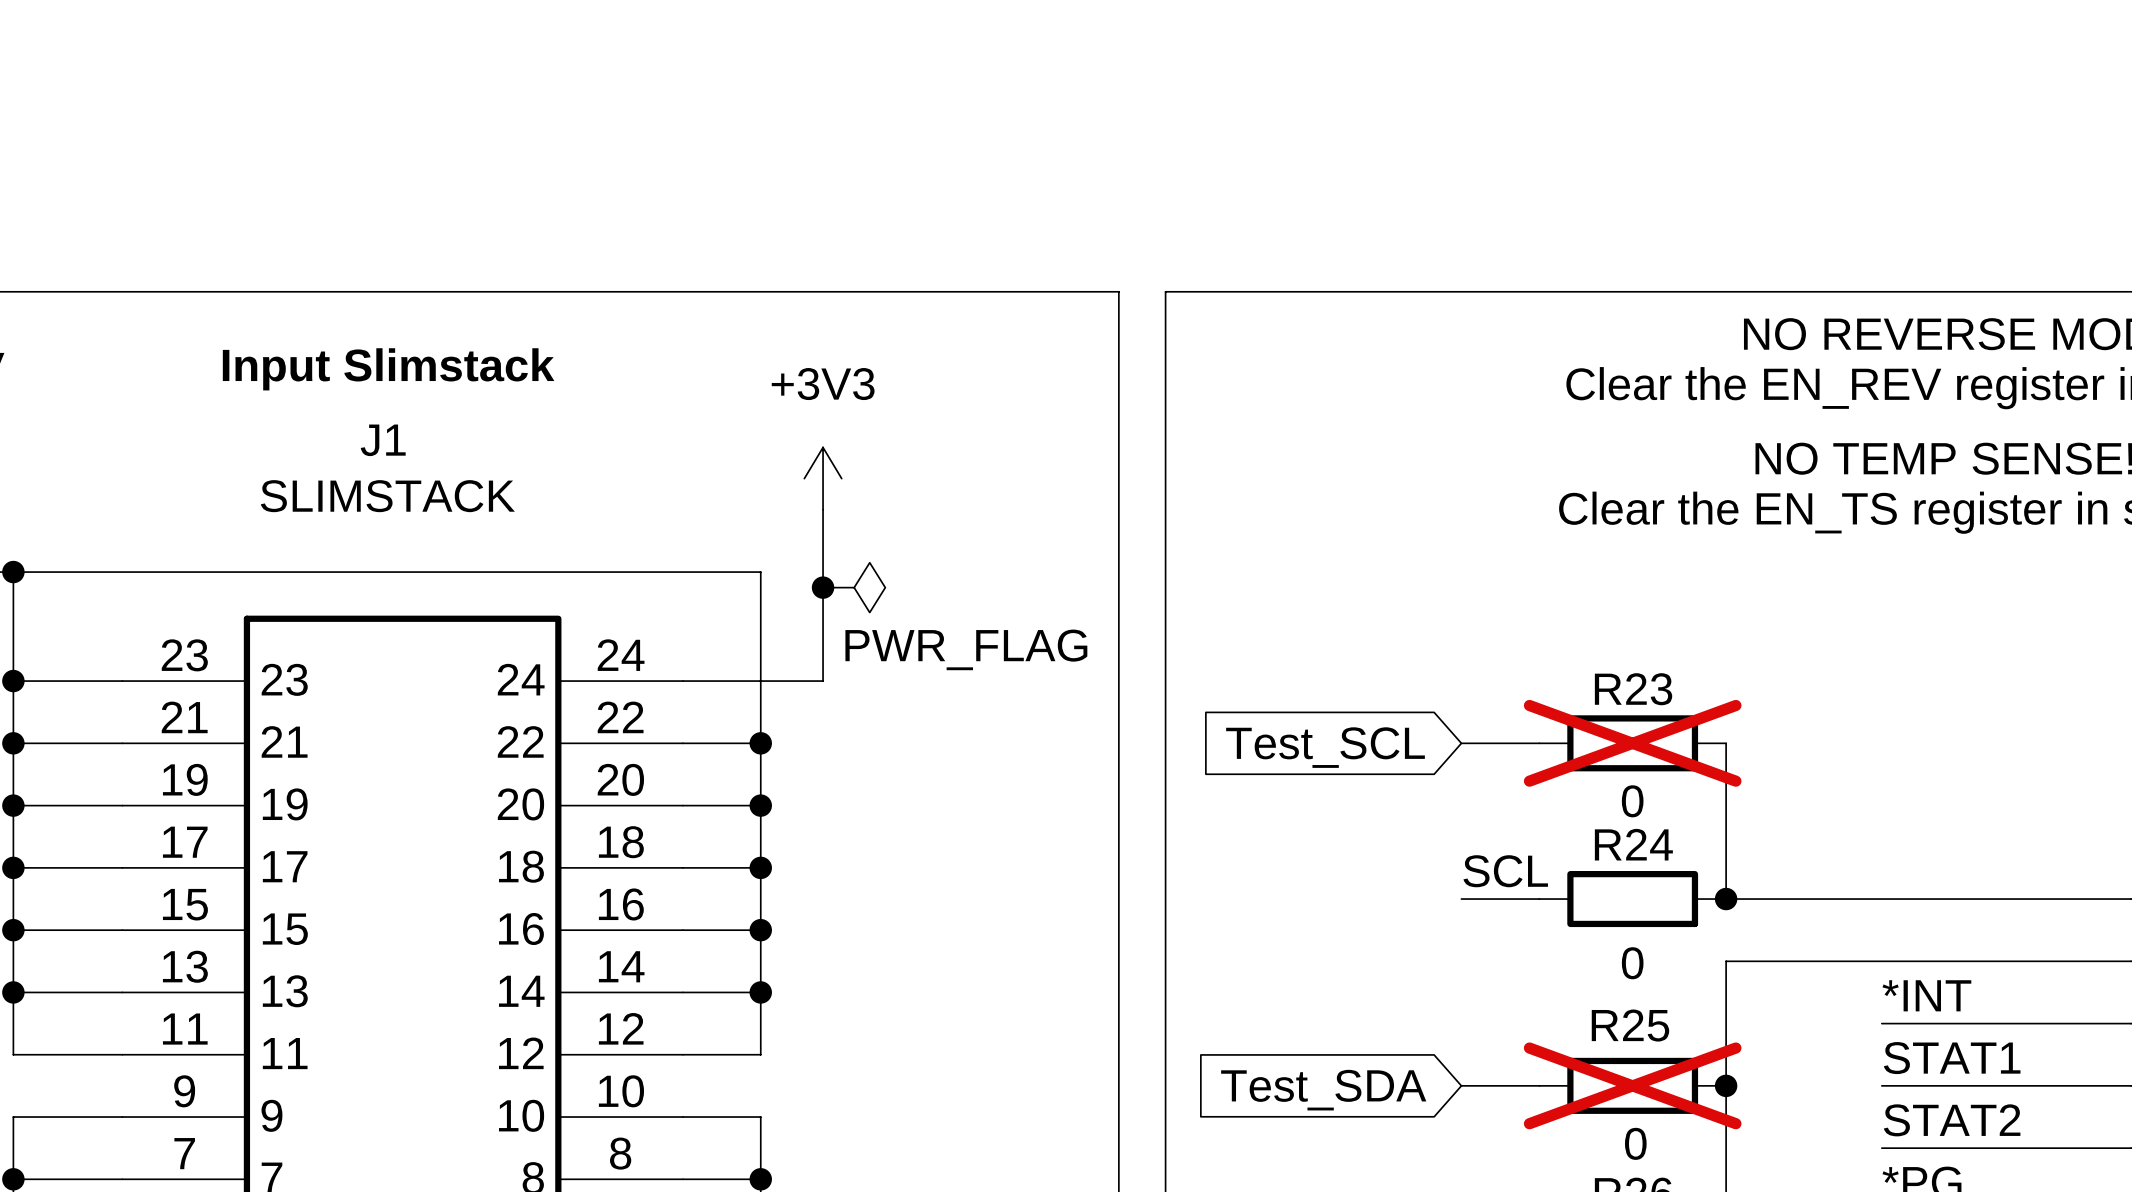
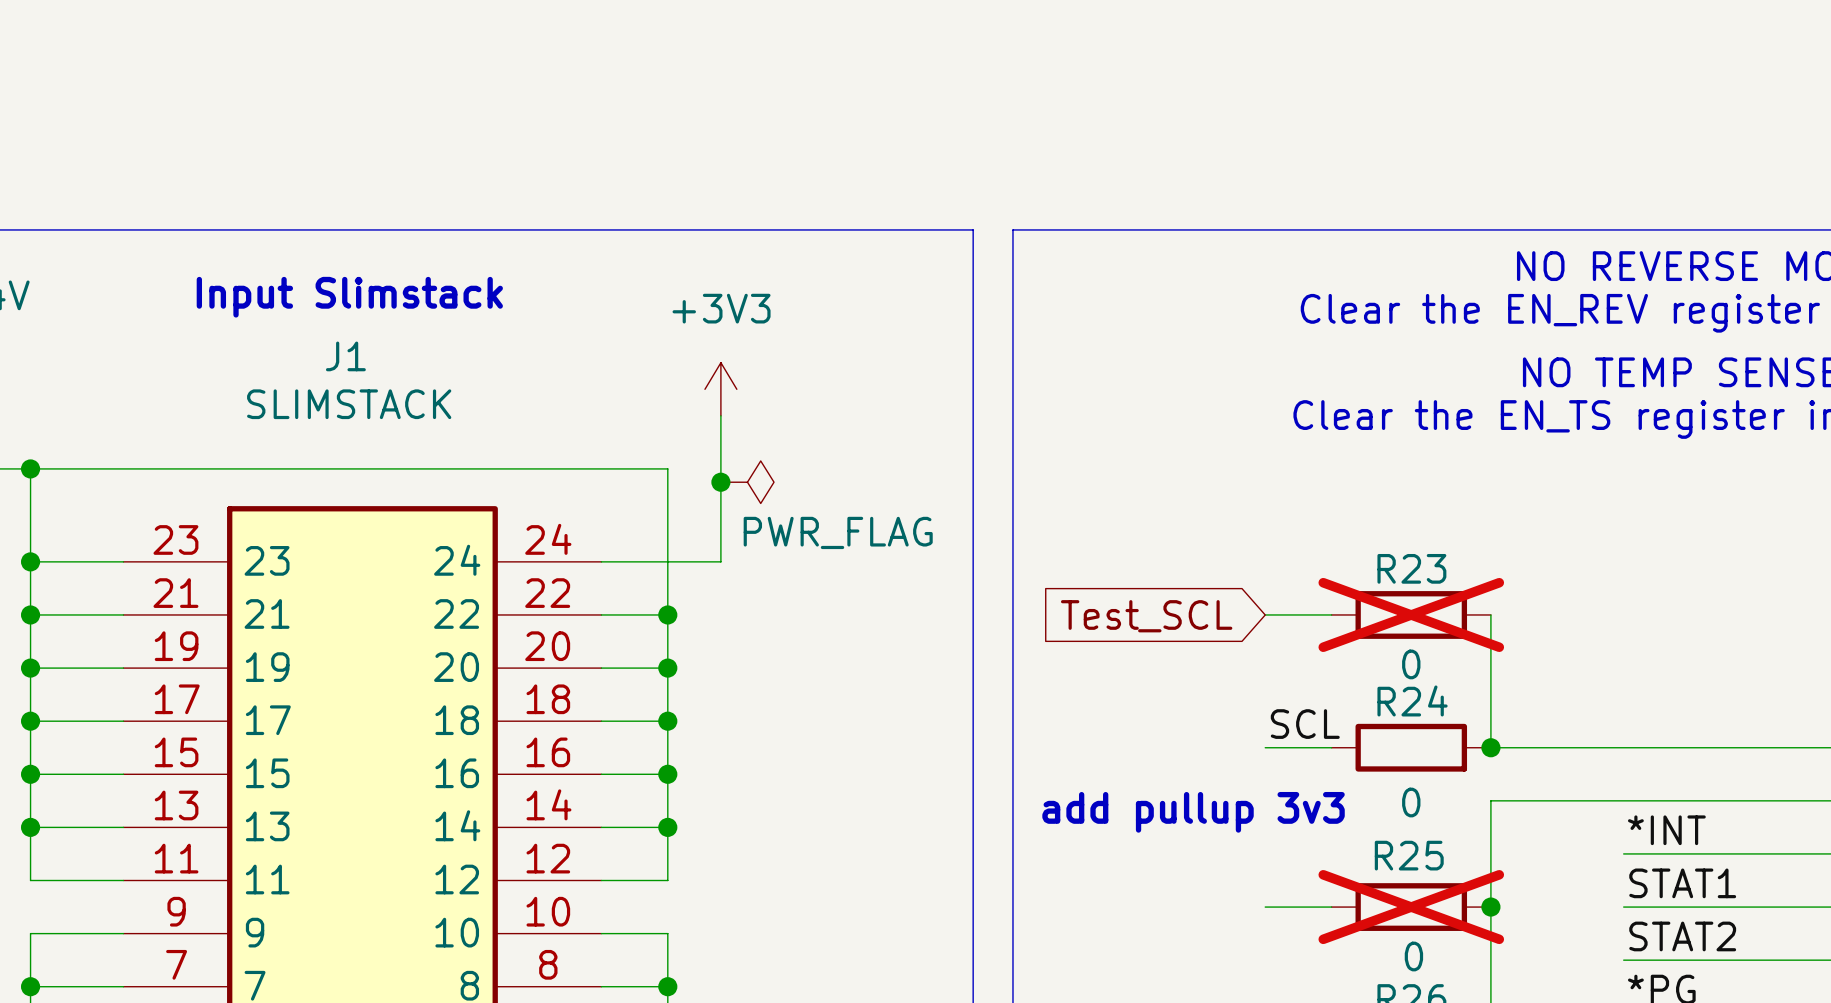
text: none -> add pullup 3v3 (1193, 812)
global label: Test_SDA (1323, 1090) -> none

